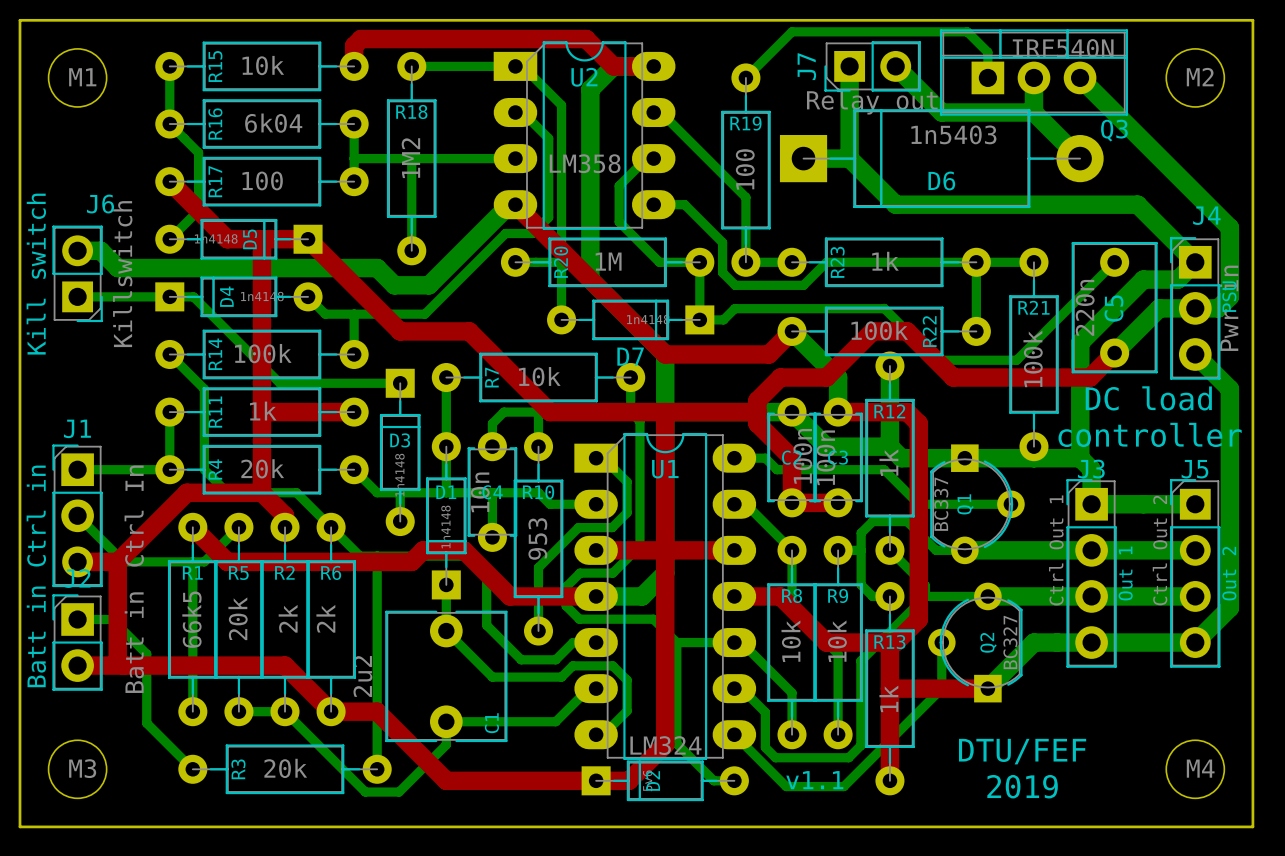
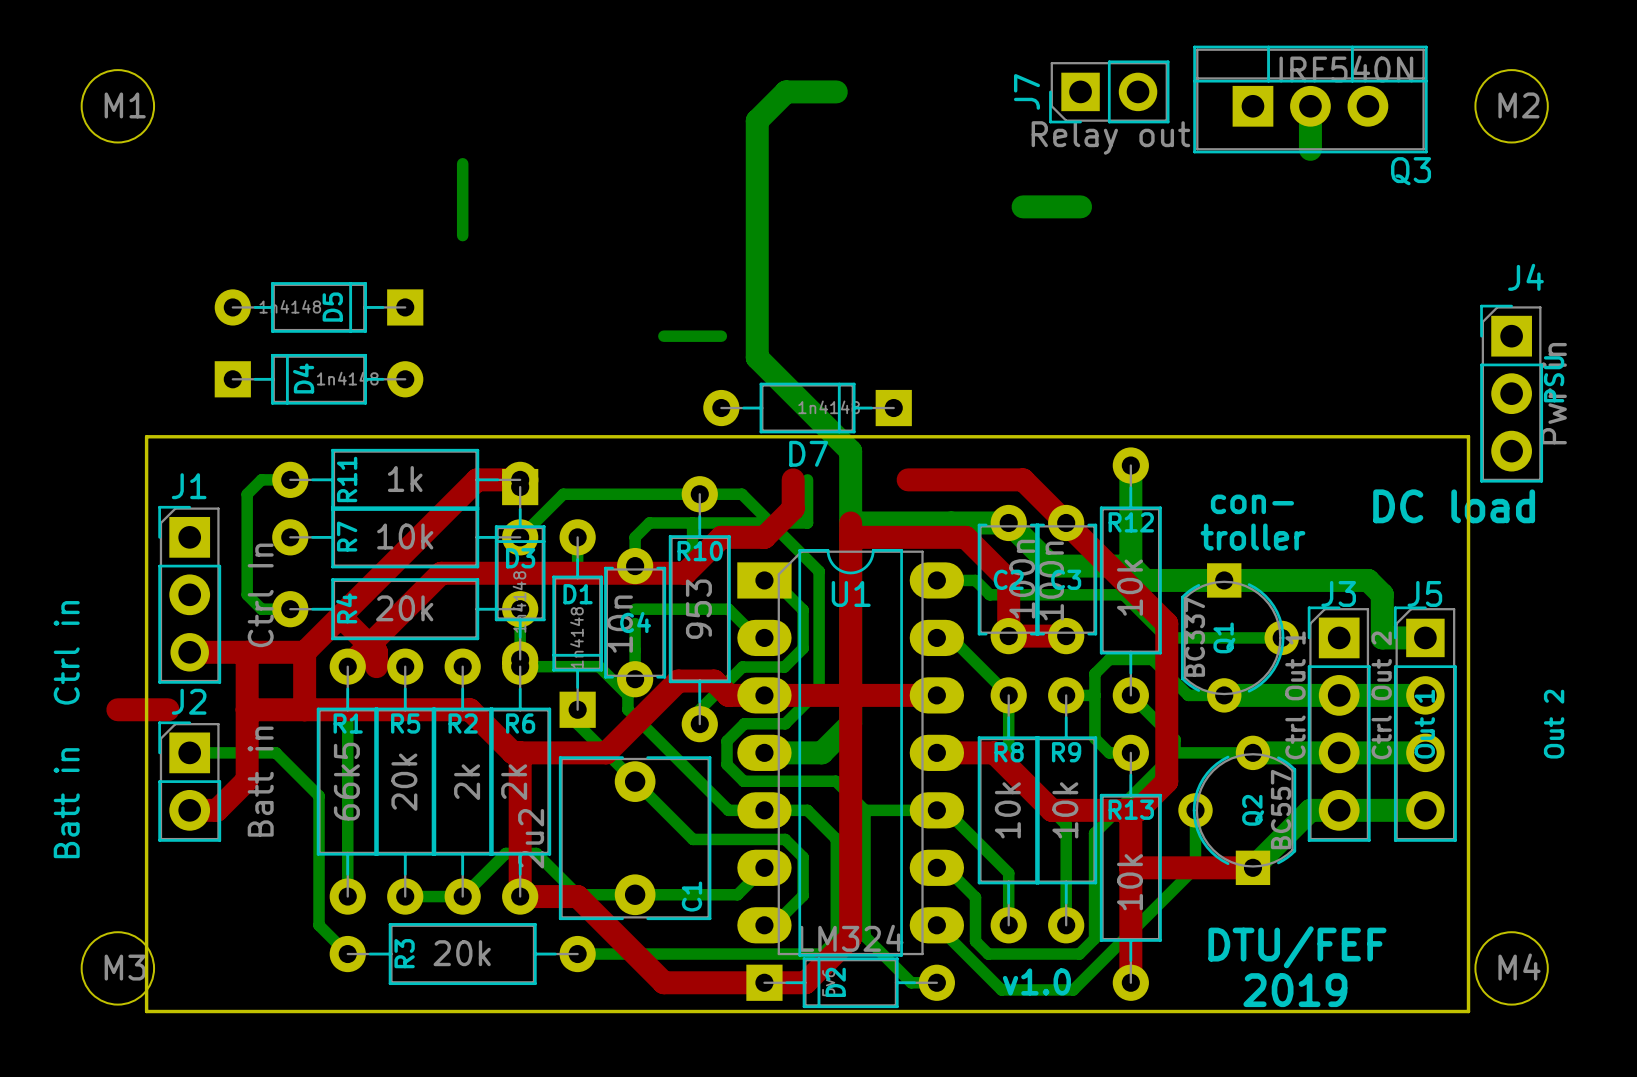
board edge: (19, 20) (1252, 20) (1252, 826) (19, 826) (19, 20) -> none
bottom track: (169, 66) (169, 124) (198, 152) (198, 210) (169, 239) -> none
R15: 10k (261, 66) -> none
top track: (354, 66) (354, 45) (360, 39) (586, 39) (613, 66) (653, 66) -> none
bottom track: (411, 66) (522, 66) (561, 105) (561, 319) -> none
bottom track: (849, 66) (849, 158) (895, 204) (1137, 204) (1195, 262) (1178, 279) (1143, 279) (1080, 342) (1080, 458) -> none
bottom track: (895, 66) (941, 112) (1033, 112) (1080, 158) -> none
bottom track: (745, 77) (792, 31) (967, 31) (987, 52) (987, 77) -> none
bottom track: (1080, 77) (1229, 227) (1229, 296) (1218, 308) (1159, 308) (1114, 353) -> none
bottom track: (515, 112) (522, 112) (548, 138) (548, 217) (532, 233) (505, 233) (424, 314) (325, 314) (308, 296) -> none
bottom track: (653, 112) (660, 112) (745, 197) (745, 262) (792, 262) -> none
R16: 6k04 (261, 124) -> none
U2: LM358 (584, 135) -> none
bottom track: (354, 158) (515, 158) -> none
bottom track: (411, 158) (411, 250) -> none
R18: 1M2 (411, 158) -> none
bottom track: (653, 158) (646, 158) (619, 185) (619, 221) (659, 262) (699, 262) (699, 319) (723, 319) (734, 308) (884, 308) (936, 360) (1016, 360) (1114, 262) -> none
D6: 1n5403 (941, 158) -> none
R19: 100 (745, 170) -> none
top track: (169, 181) (227, 239) (308, 239) (400, 331) (469, 331) (550, 412) (757, 412) -> none
R17: 100 (261, 181) -> none
bottom track: (515, 204) (509, 204) (429, 285) (394, 285) (377, 268) (117, 268) (100, 250) (77, 250) -> none
top track: (515, 204) (665, 354) (768, 354) (792, 331) -> none
bottom track: (653, 204) (684, 204) (722, 242) (722, 272) (735, 285) (803, 285) (826, 262) (1033, 262) -> none
top track: (261, 239) (261, 492) (186, 492) (117, 561) (117, 659) (123, 665) -> none
R20: 1M (607, 262) -> none
R23: 1k (884, 262) -> none
bottom track: (976, 262) (976, 331) -> none
J6: Killswitch (77, 273) -> none
text: Kill switch (36, 274) -> none
bottom track: (77, 296) (193, 296) (279, 383) (400, 383) -> none
C5: 220n (1114, 307) -> none
bottom track: (354, 314) (354, 354) -> none
bottom track: (792, 331) (838, 377) (838, 412) -> none
R22: 100k (884, 331) -> none
board edge: none -> (146, 436) (146, 1011) (1468, 1011) (1468, 436) (146, 436)
top track: (1114, 353) (1090, 377) (953, 377) (907, 331) (872, 331) (826, 377) (803, 377) -> none
bottom track: (169, 354) (204, 389) (204, 469) (227, 492) (296, 492) (359, 556) (469, 556) (486, 573) (486, 625) (521, 659) (555, 659) (573, 642) -> (527, 659) (520, 666) (599, 666) (627, 695) (627, 709) (728, 810) (735, 810)
R14: 100k (261, 354) -> none
R21: 100k (1033, 354) -> none
bottom track: (1195, 354) (1229, 389) (1229, 607) (1195, 642) (1126, 642) -> none
bottom track: none -> (290, 479) (261, 479) (247, 494) (247, 594) (261, 609) (290, 609)
top track: none -> (520, 479) (477, 479) (304, 652)
bottom track: (446, 377) (446, 423) -> none
R7 position: (538, 377) -> (405, 537)
top track: none -> (793, 479) (793, 508) (764, 537) (721, 537) (685, 573) (441, 573) (347, 666)
top track: (780, 377) (757, 400) (757, 423) -> (994, 479) (908, 479)
text: none -> con- (1252, 504)
bottom track: (169, 412) (169, 469) (77, 469) -> none
top track: (261, 412) (354, 412) -> (189, 652) (304, 652)
R11 position: (261, 412) -> (405, 479)
bottom track: (630, 412) (639, 421) (639, 450) -> (520, 537) (563, 494) (741, 494) (819, 571)
top track: (838, 412) (907, 412) (918, 423) (918, 492) -> (1023, 479) (1166, 623)
top track: none -> (850, 537) (965, 537)
text: controller (1150, 434) -> troller (1252, 537)
bottom track: (446, 452) (446, 492) -> none
R12 value: 1k (888, 462) -> 10k (1130, 587)
R4 position: (261, 469) -> (405, 609)
bottom track: (354, 469) (377, 492) (538, 492) (550, 504) (590, 504) -> (635, 609) (728, 609) (757, 637)
bottom track: (1126, 504) (1195, 504) -> none
bottom track: (77, 515) (123, 561) (204, 561) (238, 527) -> none
J1 position: (77, 515) -> (189, 594)
top track: none -> (247, 652) (247, 780) (216, 810) (189, 810)
top track: none -> (304, 652) (304, 709) (247, 709)
D1 position: (446, 515) -> (577, 623)
top track: (192, 527) (227, 561) -> none
R10 position: (538, 538) -> (699, 609)
bottom track: (1126, 550) (1195, 550) -> none
bottom track: (377, 556) (377, 769) -> none
bottom track: (192, 561) (192, 711) -> (347, 709) (347, 896)
top track: (359, 561) (411, 561) (423, 550) (463, 550) (510, 596) (596, 596) -> (469, 709) (512, 752) (606, 752) (678, 681) (714, 681) (728, 695) (764, 695)
bottom track: (544, 561) (538, 567) (538, 631) -> none
J3 position: (1091, 573) -> (1339, 724)
J5 position: (1195, 573) -> (1425, 724)
bottom track: (446, 584) (446, 631) (492, 677) (561, 677) (572, 665) -> (577, 709) (577, 724) (692, 839) (735, 839)
bottom track: none -> (189, 752) (275, 752) (319, 795) (319, 925) (347, 954)
bottom track: (1126, 596) (1195, 596) -> none
bottom track: (77, 619) (112, 619) (146, 654) (146, 723) (192, 769) -> none
R1 position: (192, 619) -> (347, 781)
R2 position: (238, 619) -> (405, 781)
R5 position: (285, 619) -> (462, 781)
R6 position: (331, 619) -> (520, 781)
J2 position: (77, 642) -> (189, 781)
bottom track: none -> (764, 810) (807, 810) (836, 839) (836, 939) (821, 954) (577, 954)
Q2 value: BC327 (1010, 642) -> BC557 (1281, 809)
top track: (77, 665) (285, 665) (331, 711) -> none
C1 position: (446, 676) -> (635, 838)
bottom track: (594, 688) (588, 688) (555, 721) (446, 721) (446, 744) (399, 792) (365, 792) (285, 711) (238, 711) -> none
bottom track: none -> (764, 867) (737, 894) (577, 894) (536, 853) (505, 853) (462, 896) (405, 896)
R13 value: 1k (888, 698) -> 10k (1130, 882)
top track: (342, 711) (377, 711) (446, 780) (515, 780) -> (520, 752) (520, 896) (577, 896) (663, 982)
R3 position: (285, 769) -> (462, 954)
text: v1.1 (814, 780) -> v1.0 (1036, 981)

